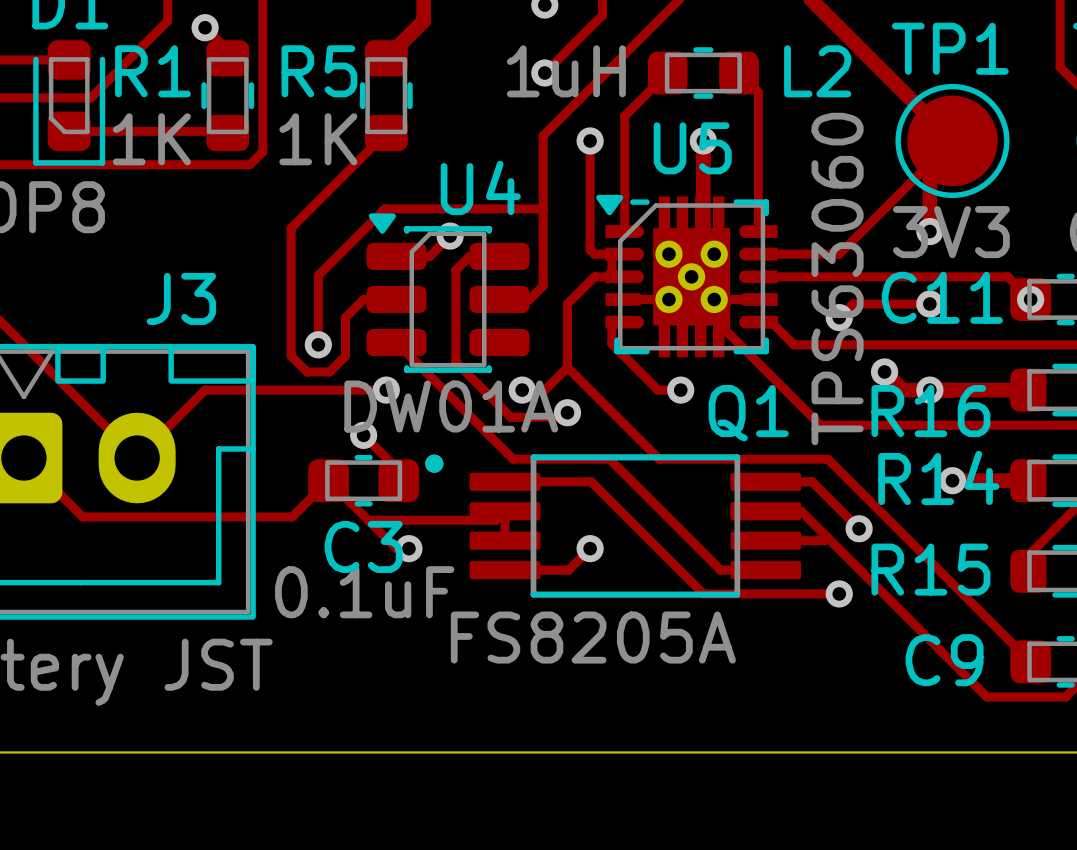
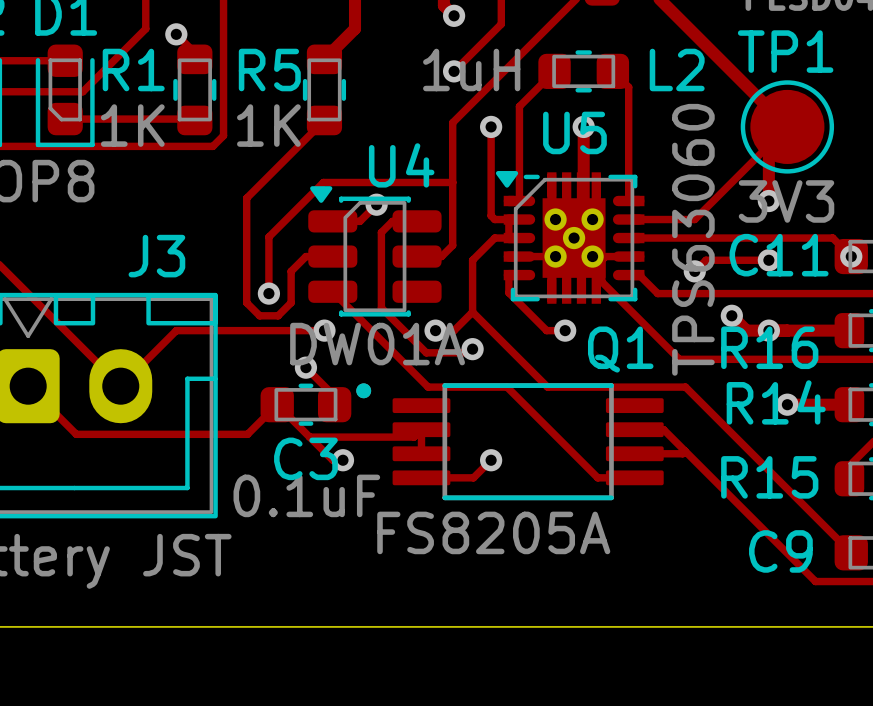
track: (504, 481) (591, 481) (703, 593) (839, 593) -> none
track: (765, 481) (812, 481) (859, 528) -> none
via: (859, 528) -> none
via: (839, 593) -> none

